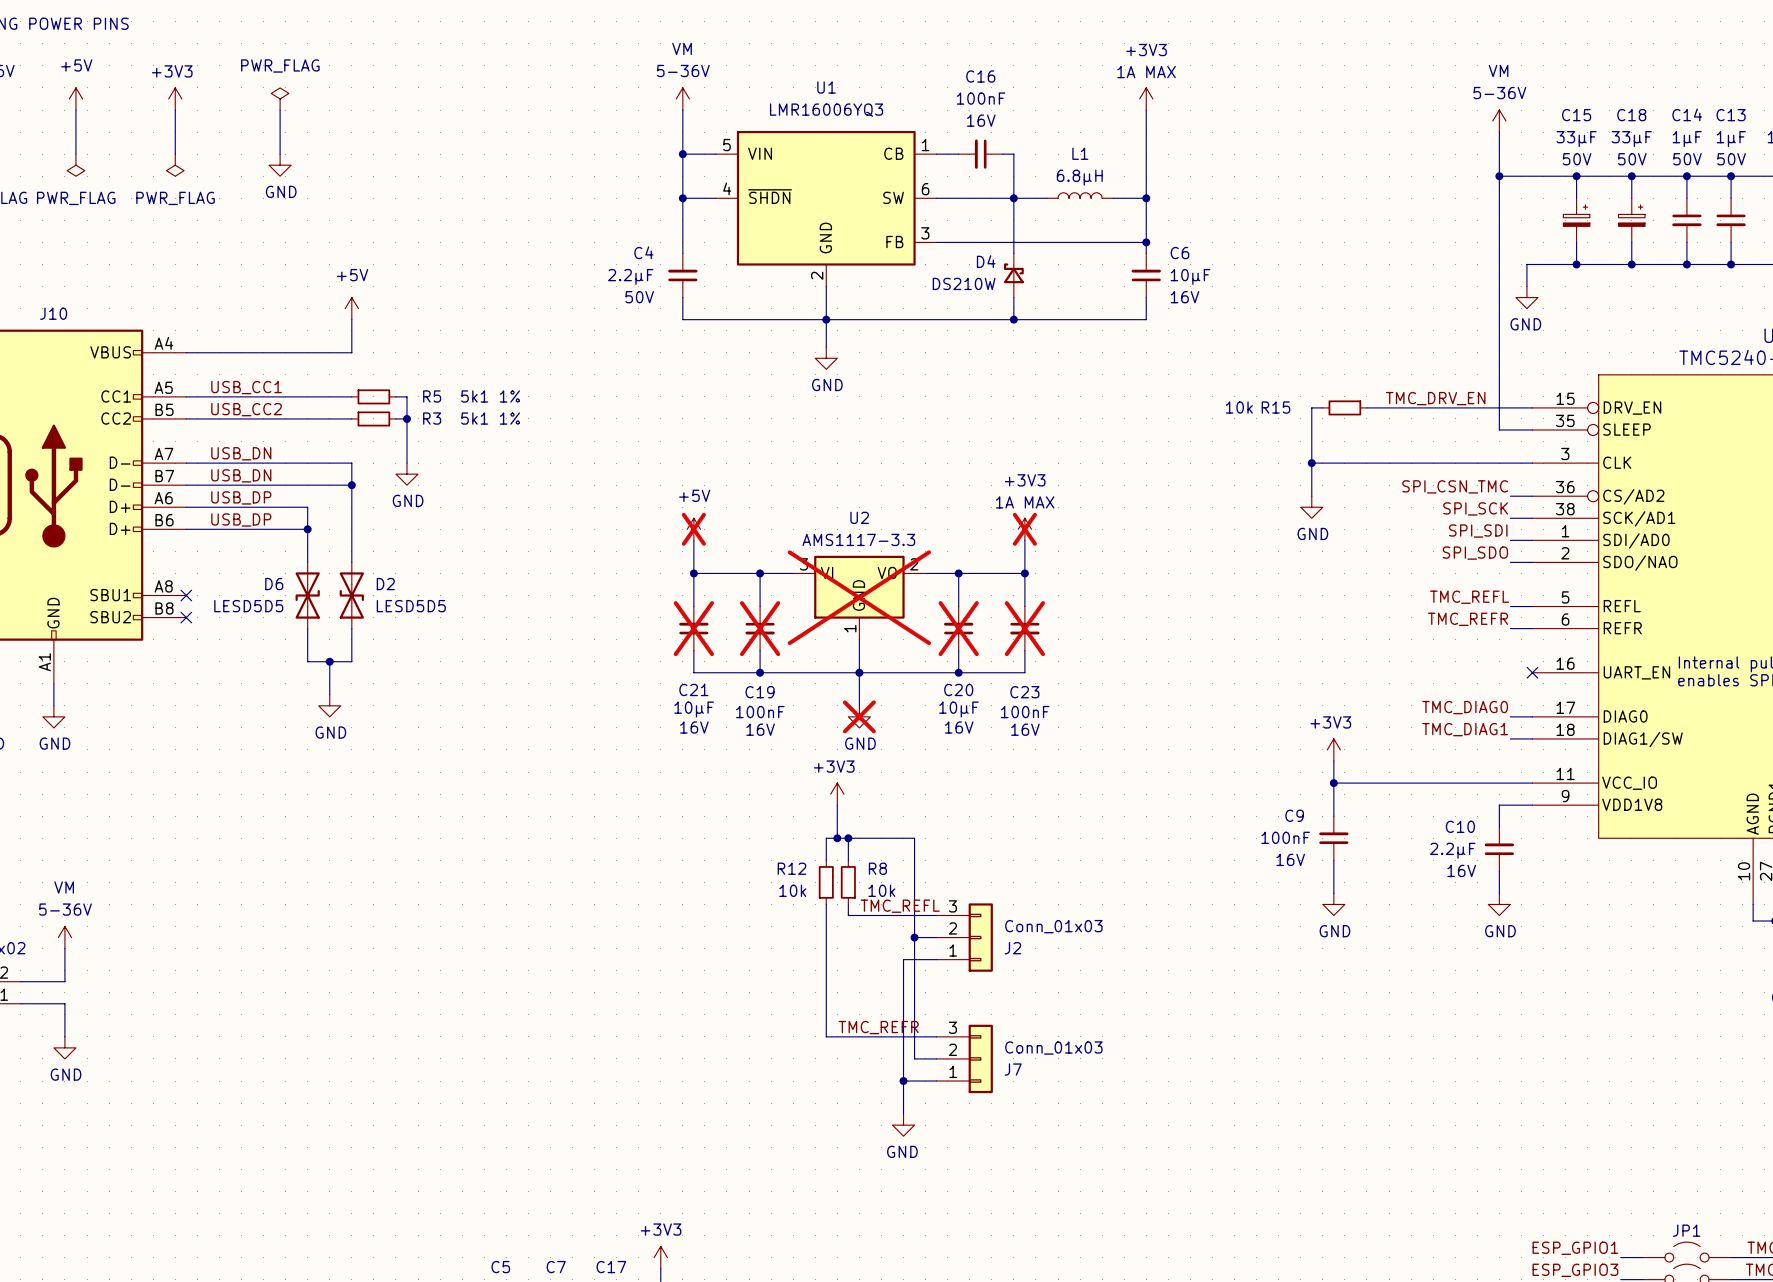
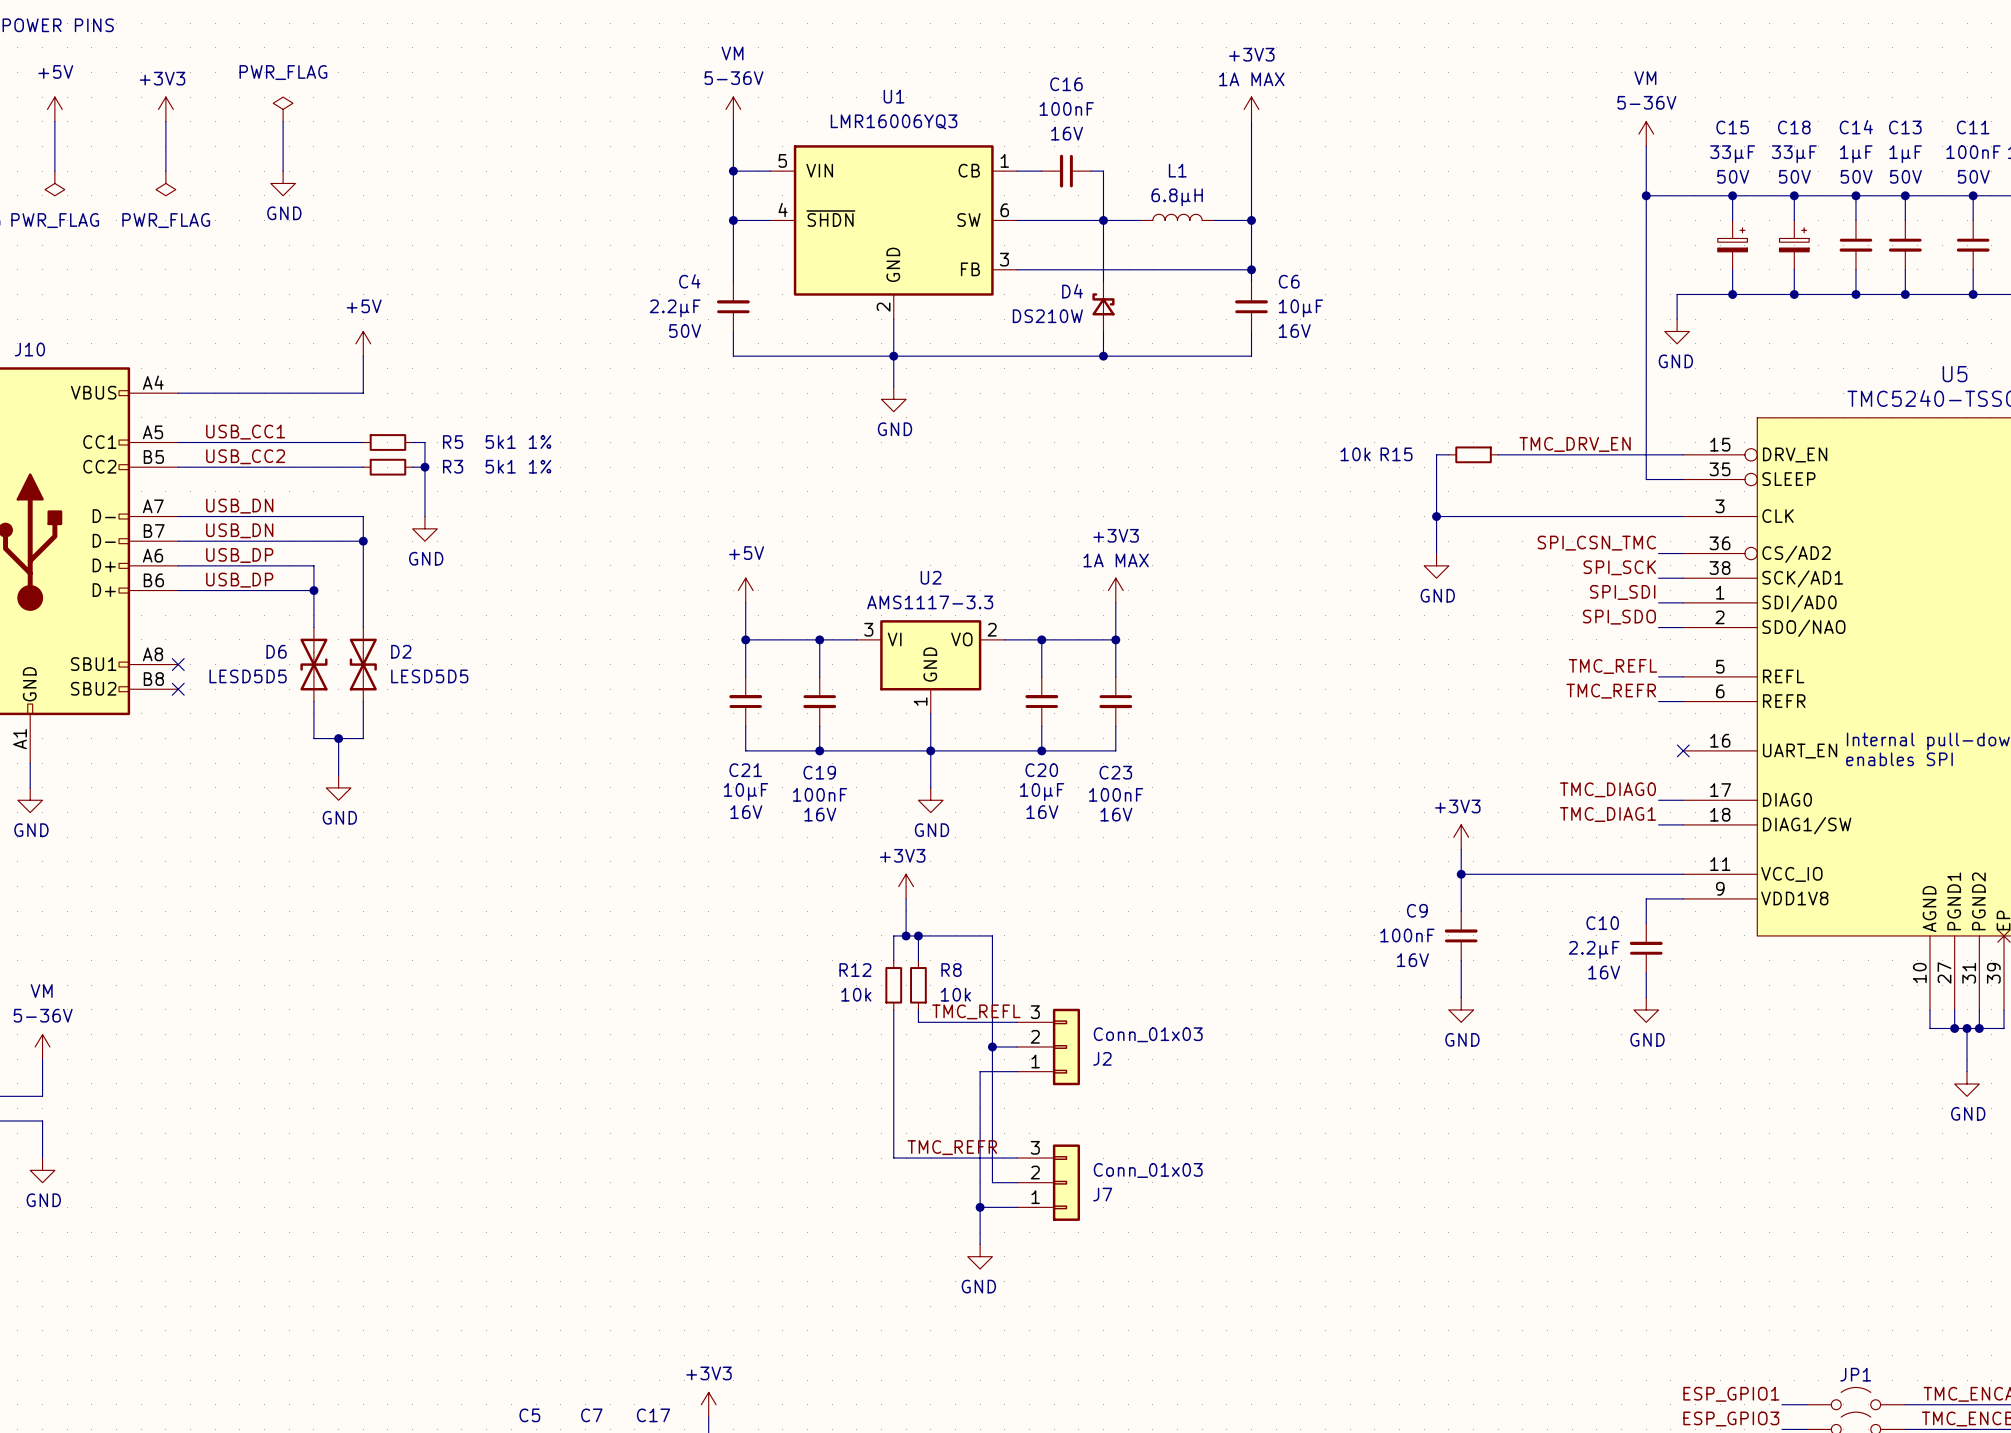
power symbol do-not-place cross: (693, 529) -> none
power symbol do-not-place cross: (1024, 529) -> none
U2 do-not-place cross: (859, 597) -> none
C21 do-not-place cross: (693, 628) -> none
C19 do-not-place cross: (760, 628) -> none
C20 do-not-place cross: (958, 628) -> none
C23 do-not-place cross: (1024, 628) -> none
power symbol do-not-place cross: (859, 716) -> none

